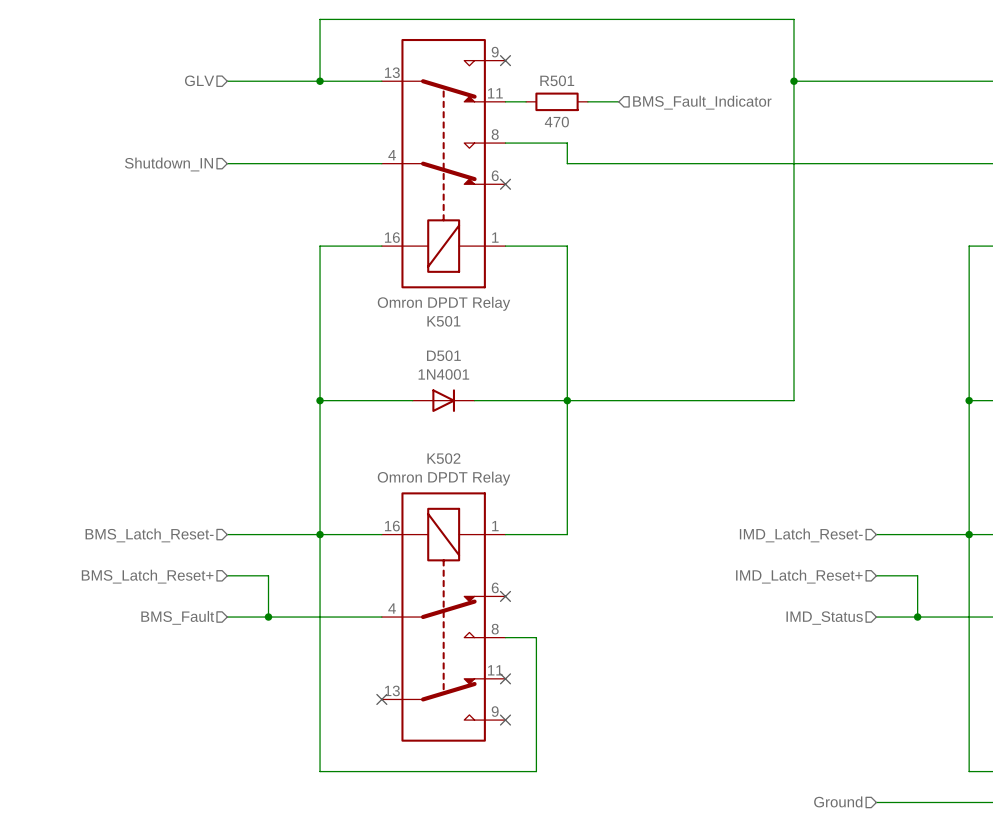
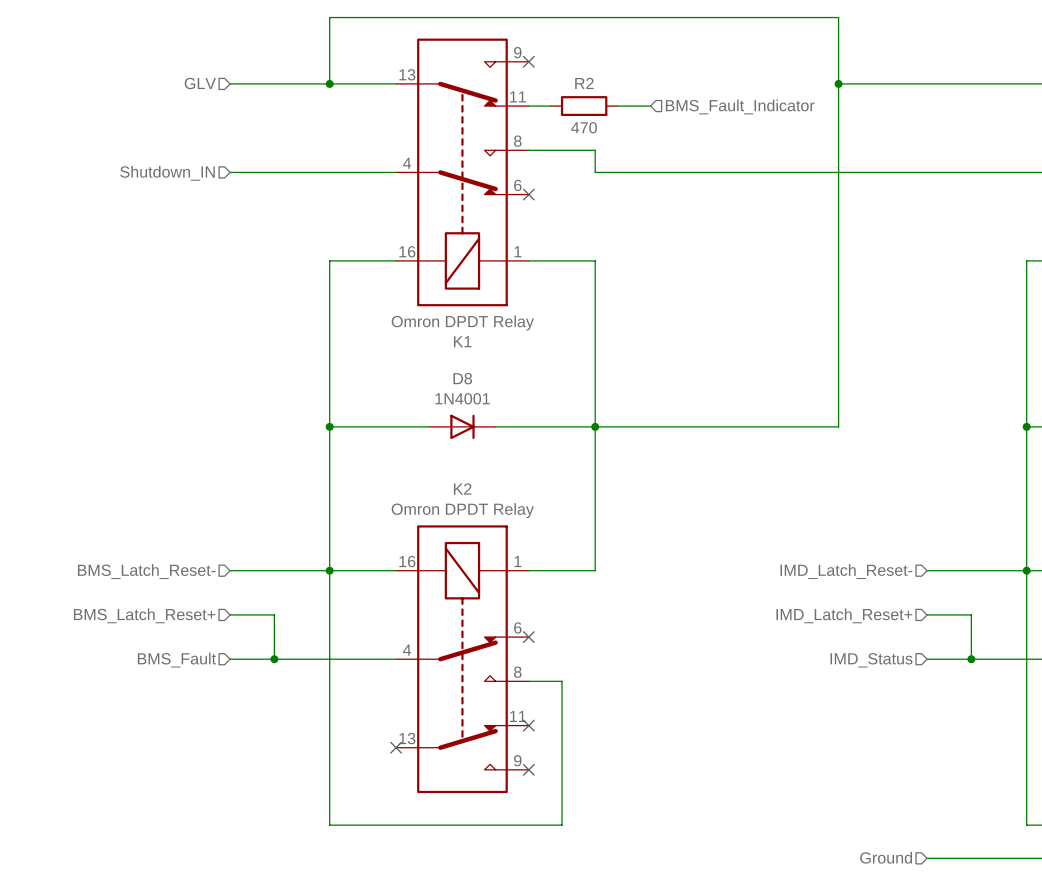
R501 name: R501 (557, 80) -> R2 (584, 83)
K501 name: K501 (443, 321) -> K1 (462, 341)
D501 name: D501 (443, 355) -> D8 (462, 378)
K502 name: K502 (443, 458) -> K2 (462, 489)

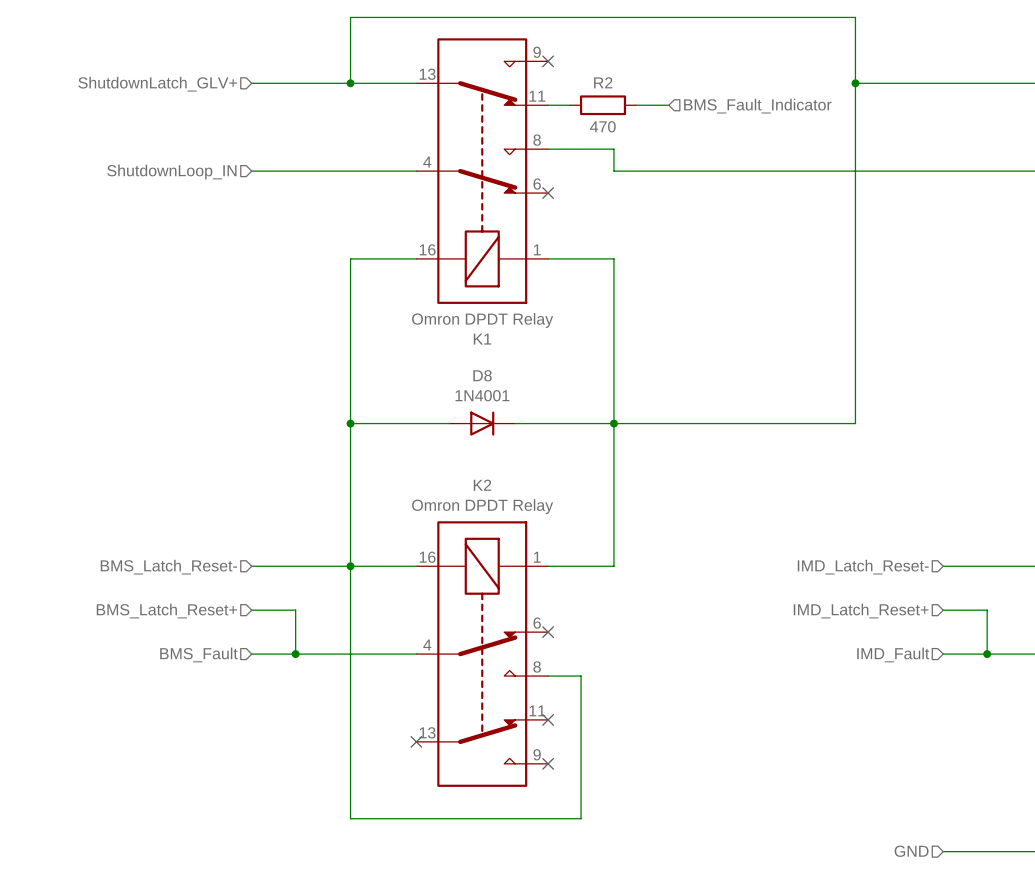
hierarchical label: GLV (200, 83) -> ShutdownLatch_GLV+ (157, 84)
hierarchical label: Shutdown_IN (167, 173) -> ShutdownLoop_IN (171, 172)
hierarchical label: IMD_Status (871, 660) -> IMD_Fault (893, 654)
hierarchical label: Ground (886, 857) -> GND (911, 851)

